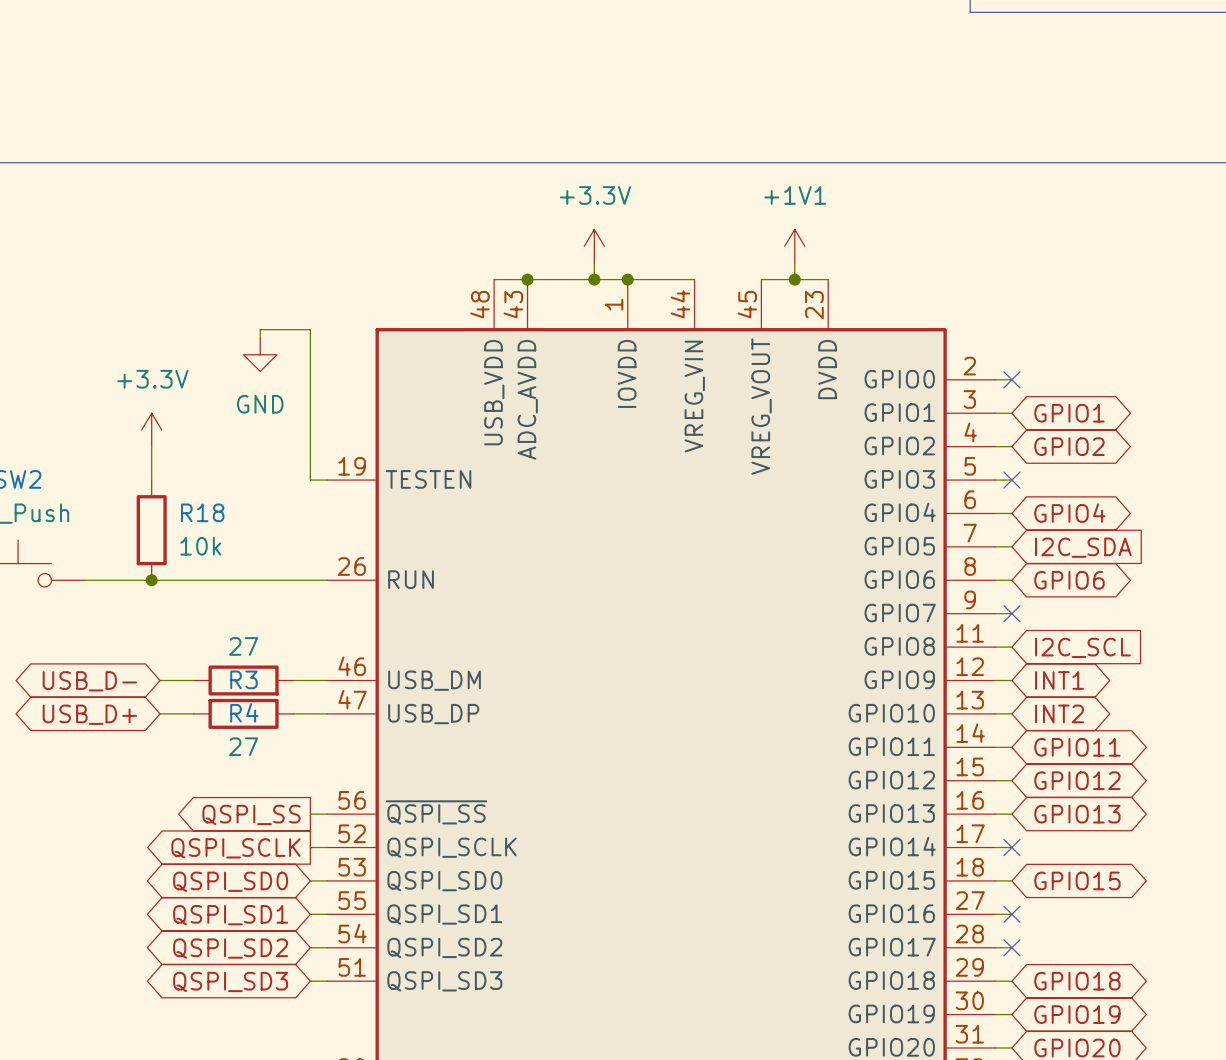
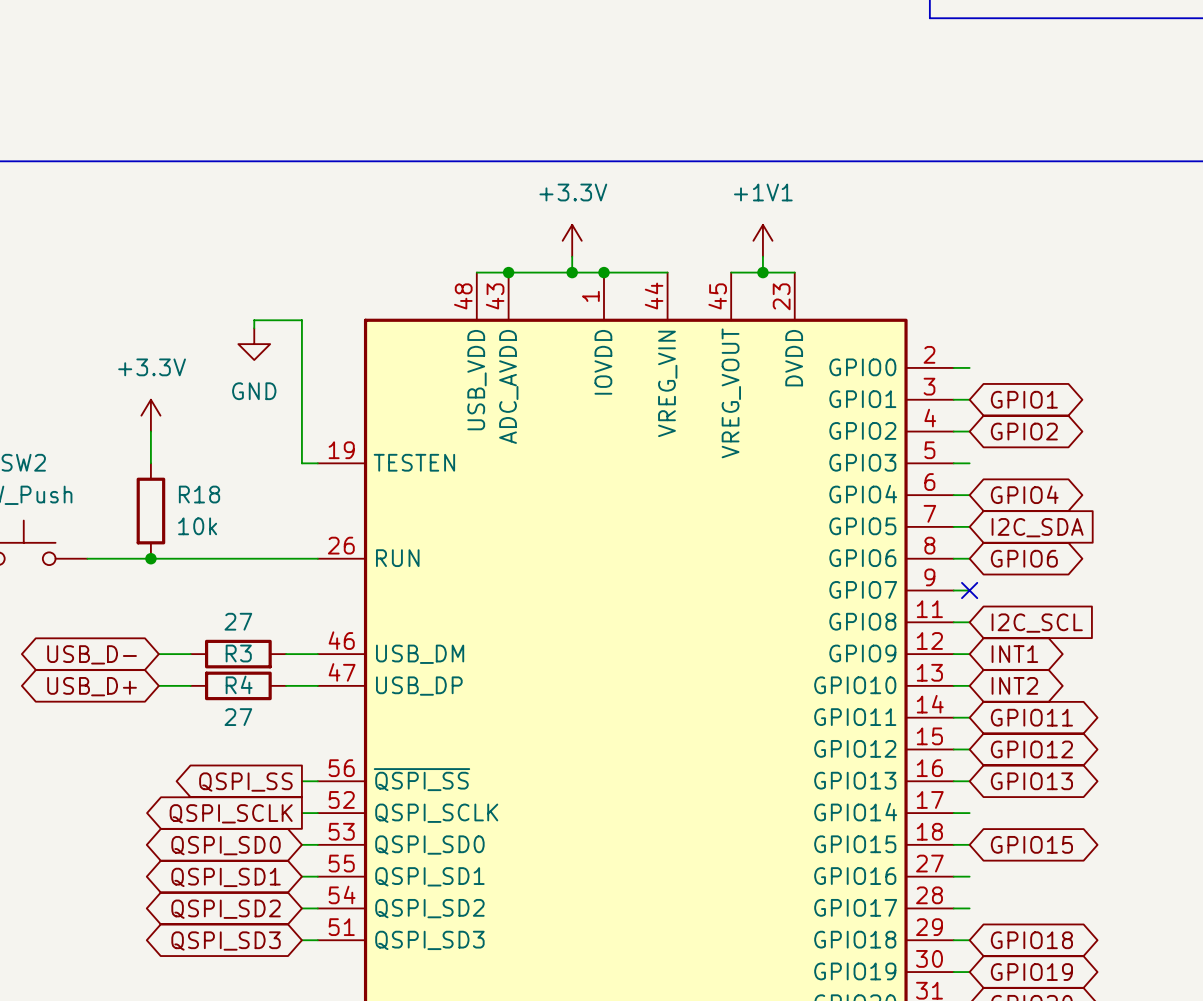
no-connect mark: (1011, 379) -> none
no-connect mark: (1011, 480) -> none
no-connect mark: (1011, 847) -> none
no-connect mark: (1011, 914) -> none
no-connect mark: (1011, 947) -> none

